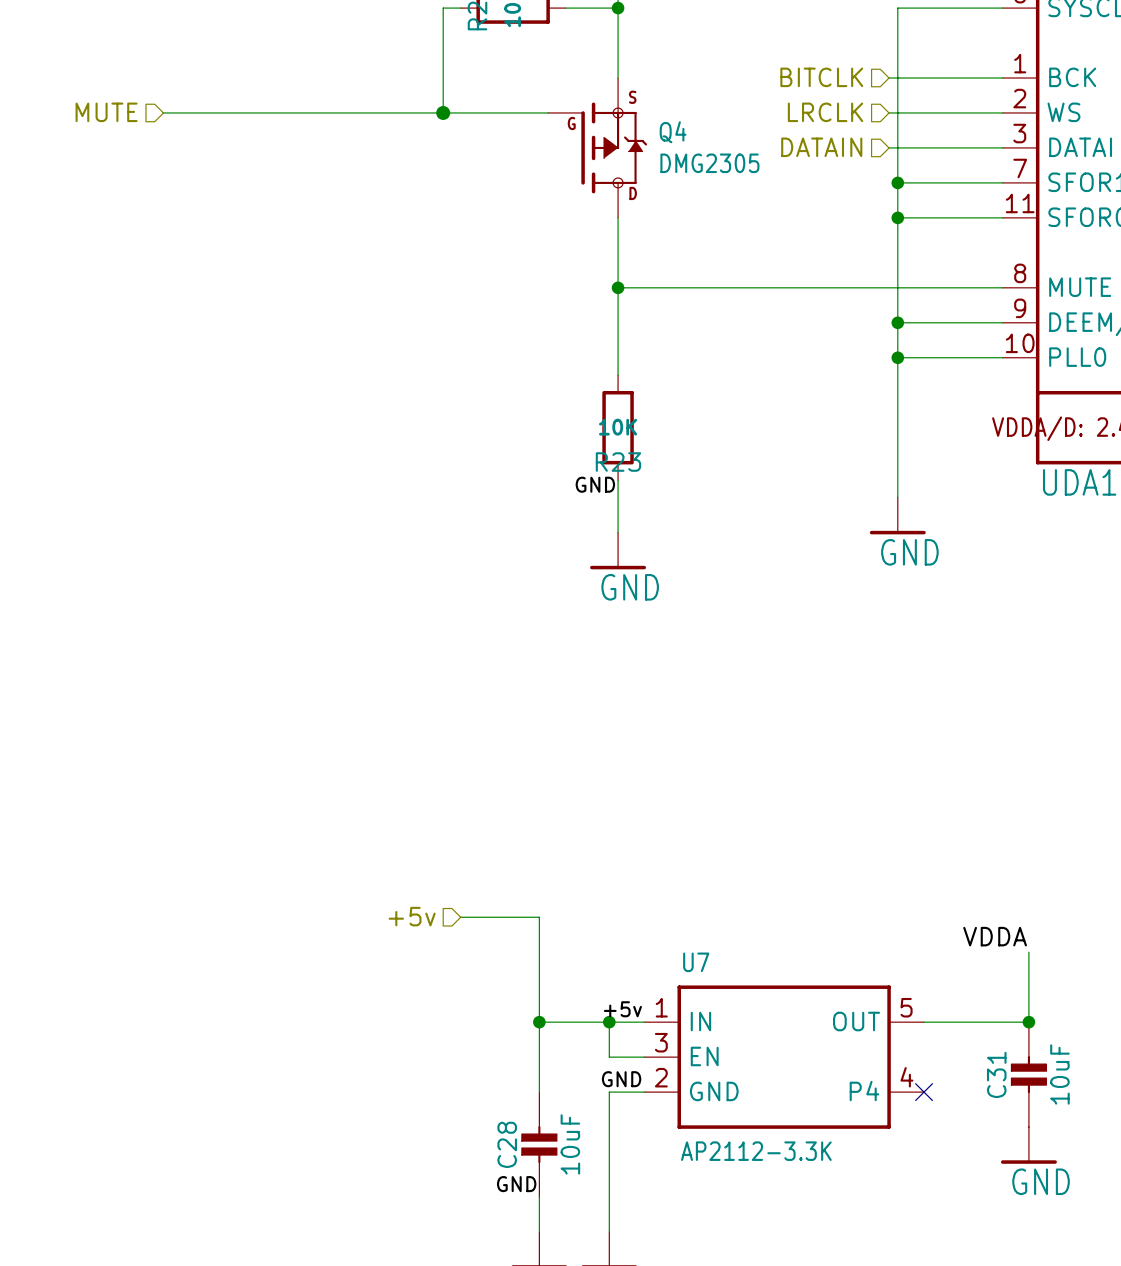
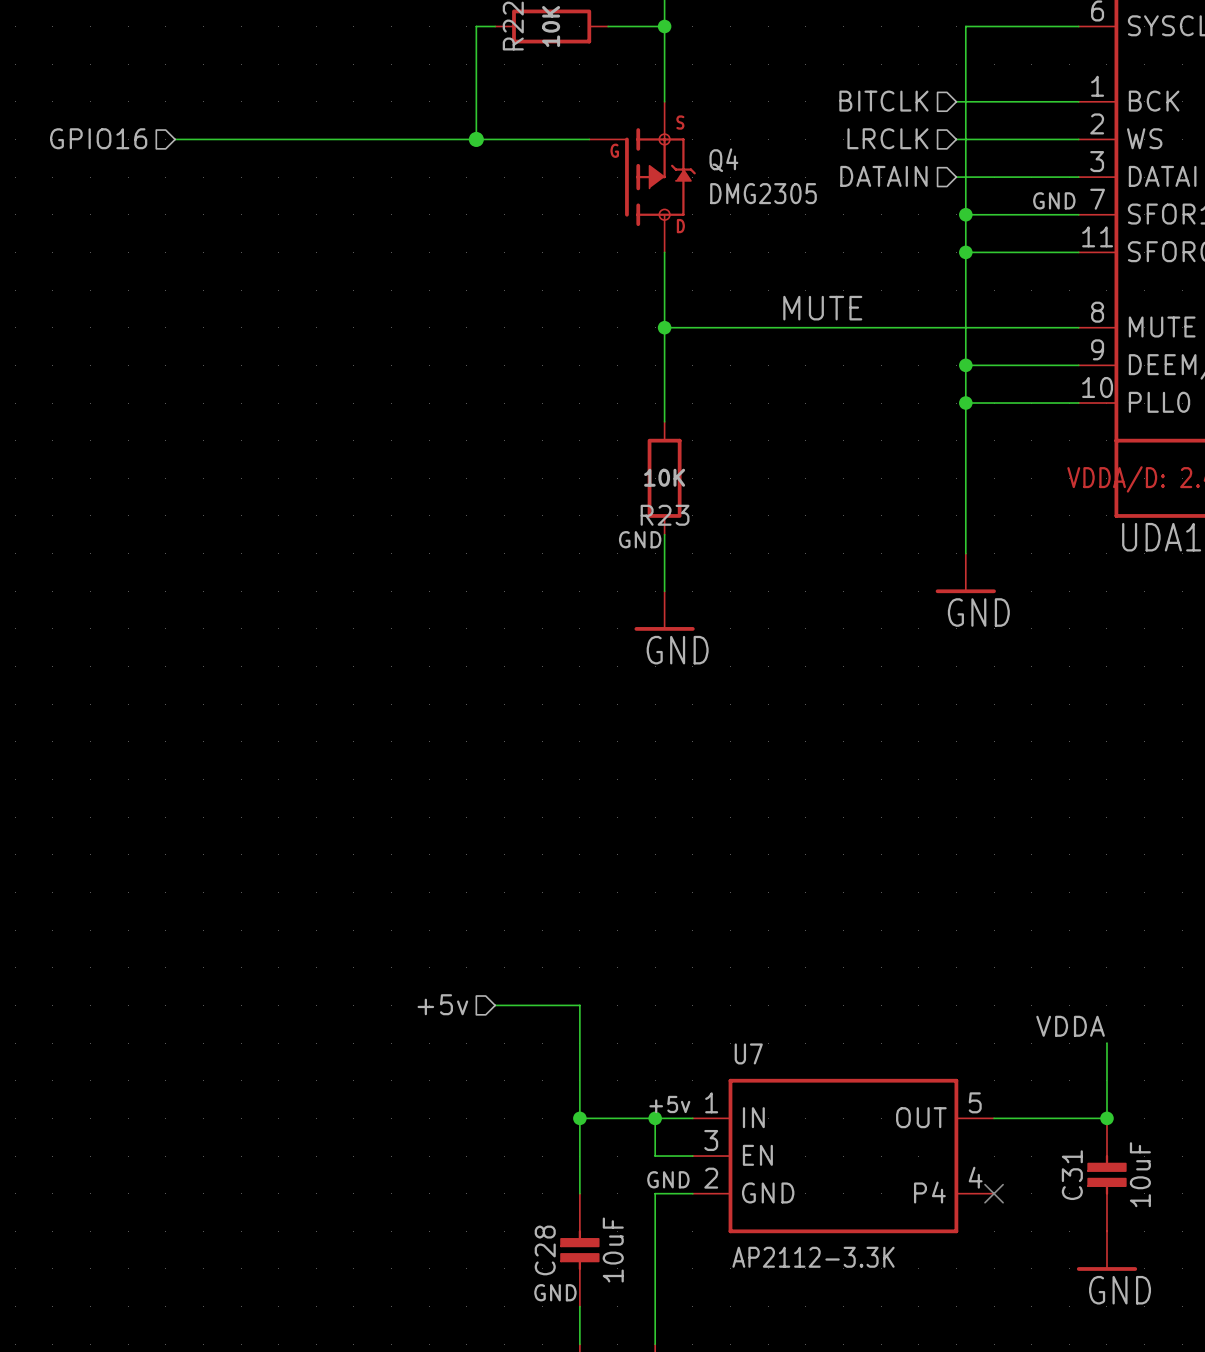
hierarchical label: MUTE (106, 112) -> GPIO16 (98, 138)
label: none -> GND (1054, 200)
label: none -> MUTE (822, 308)

